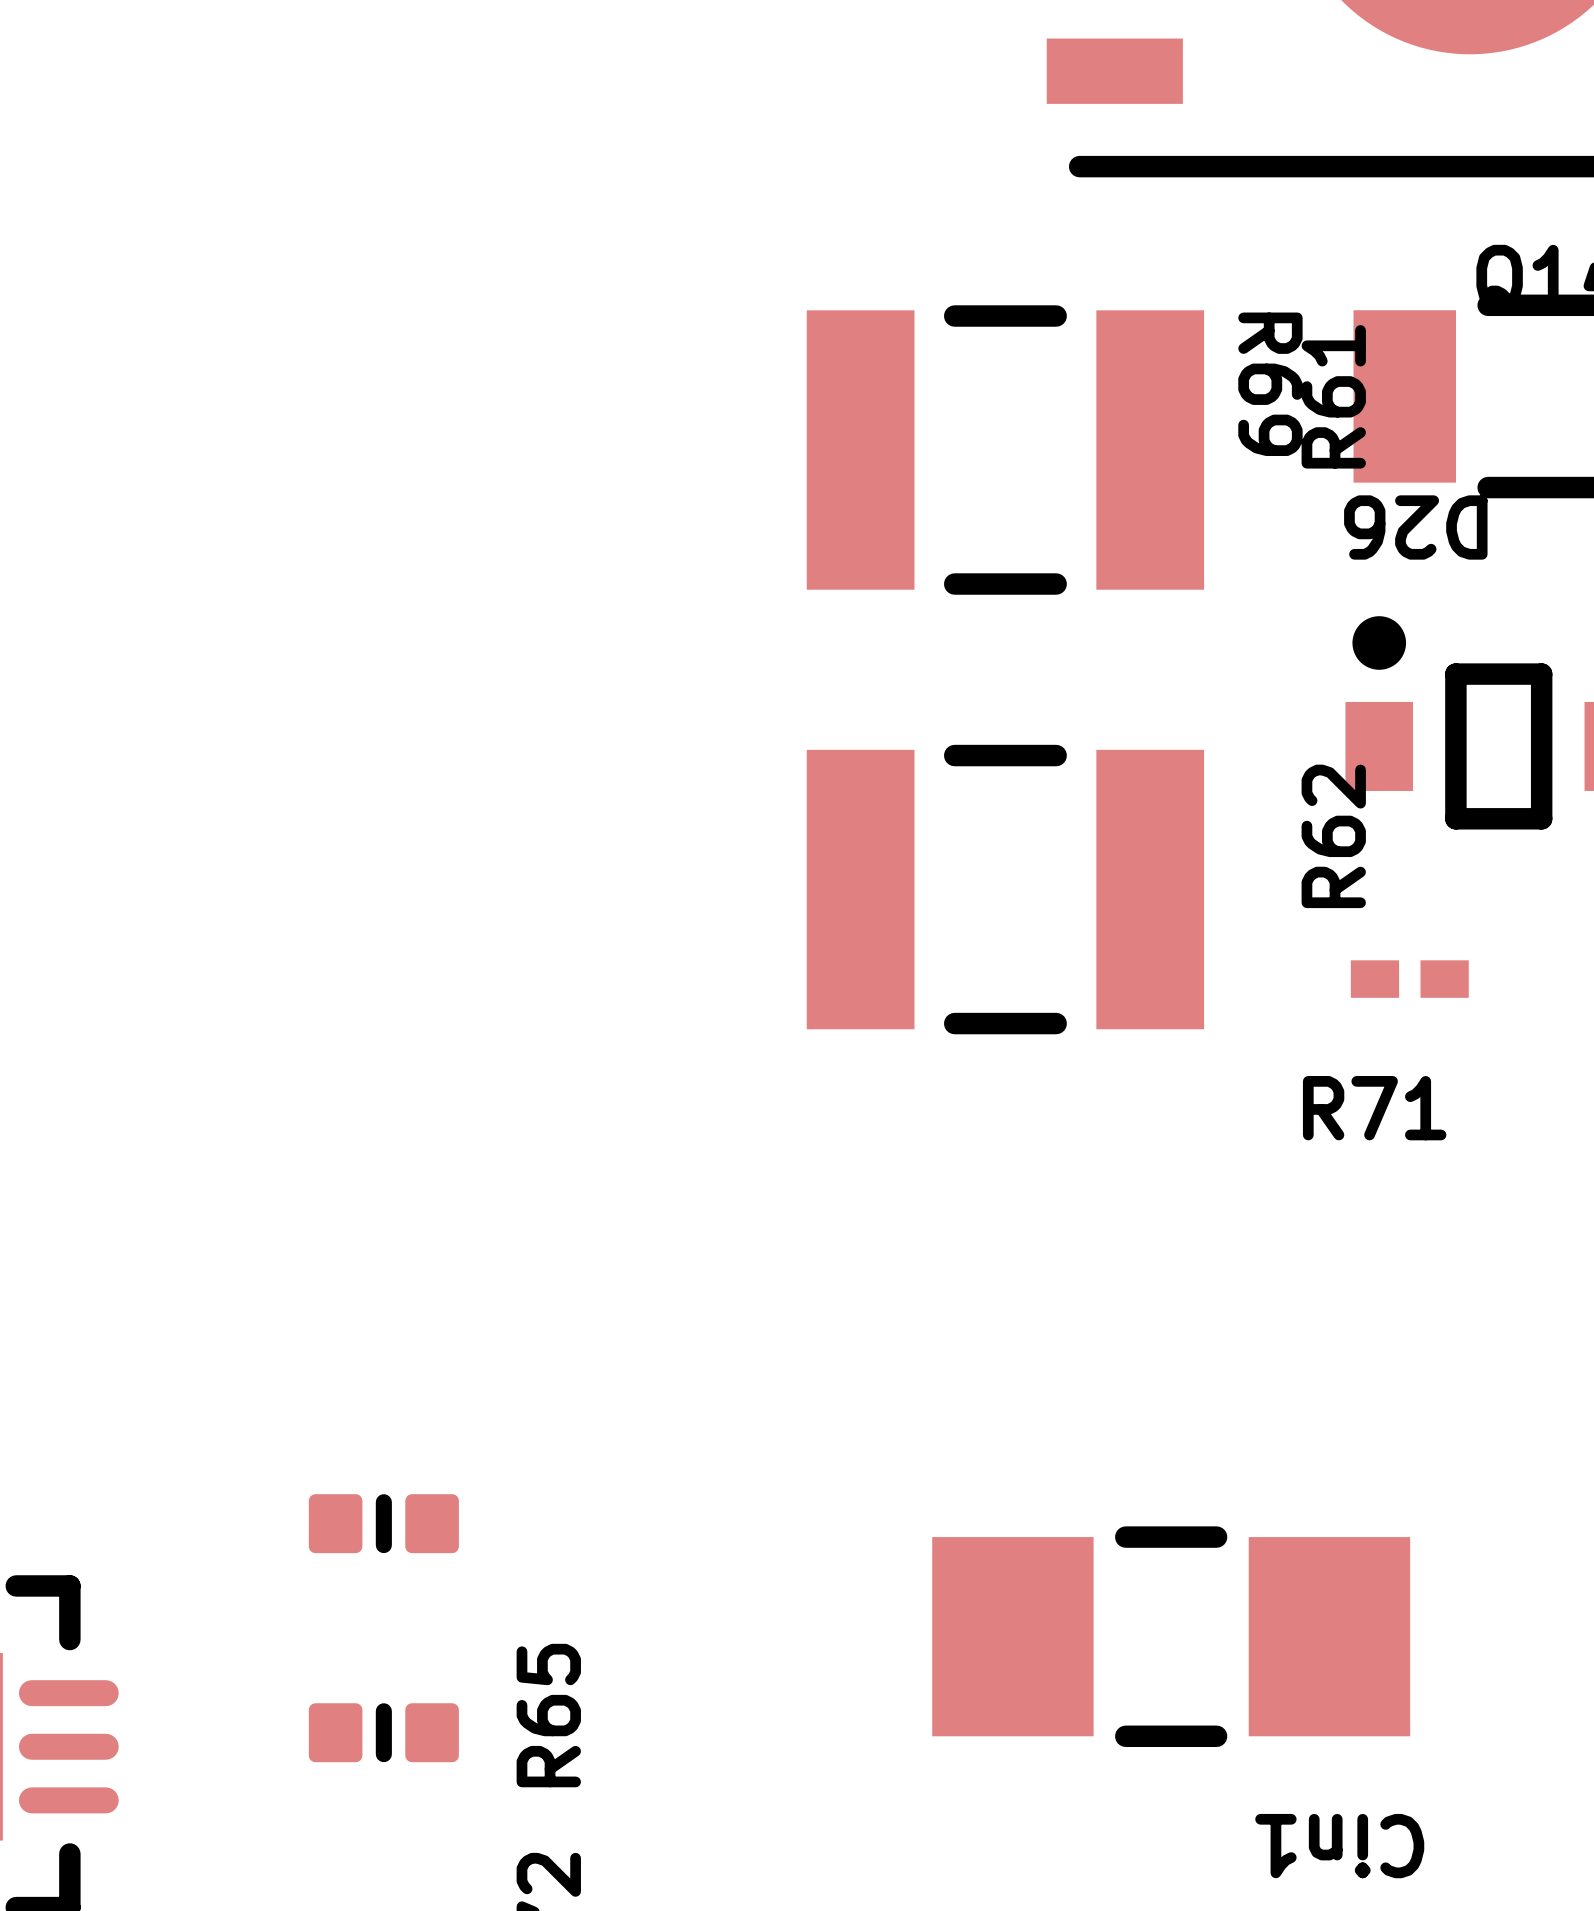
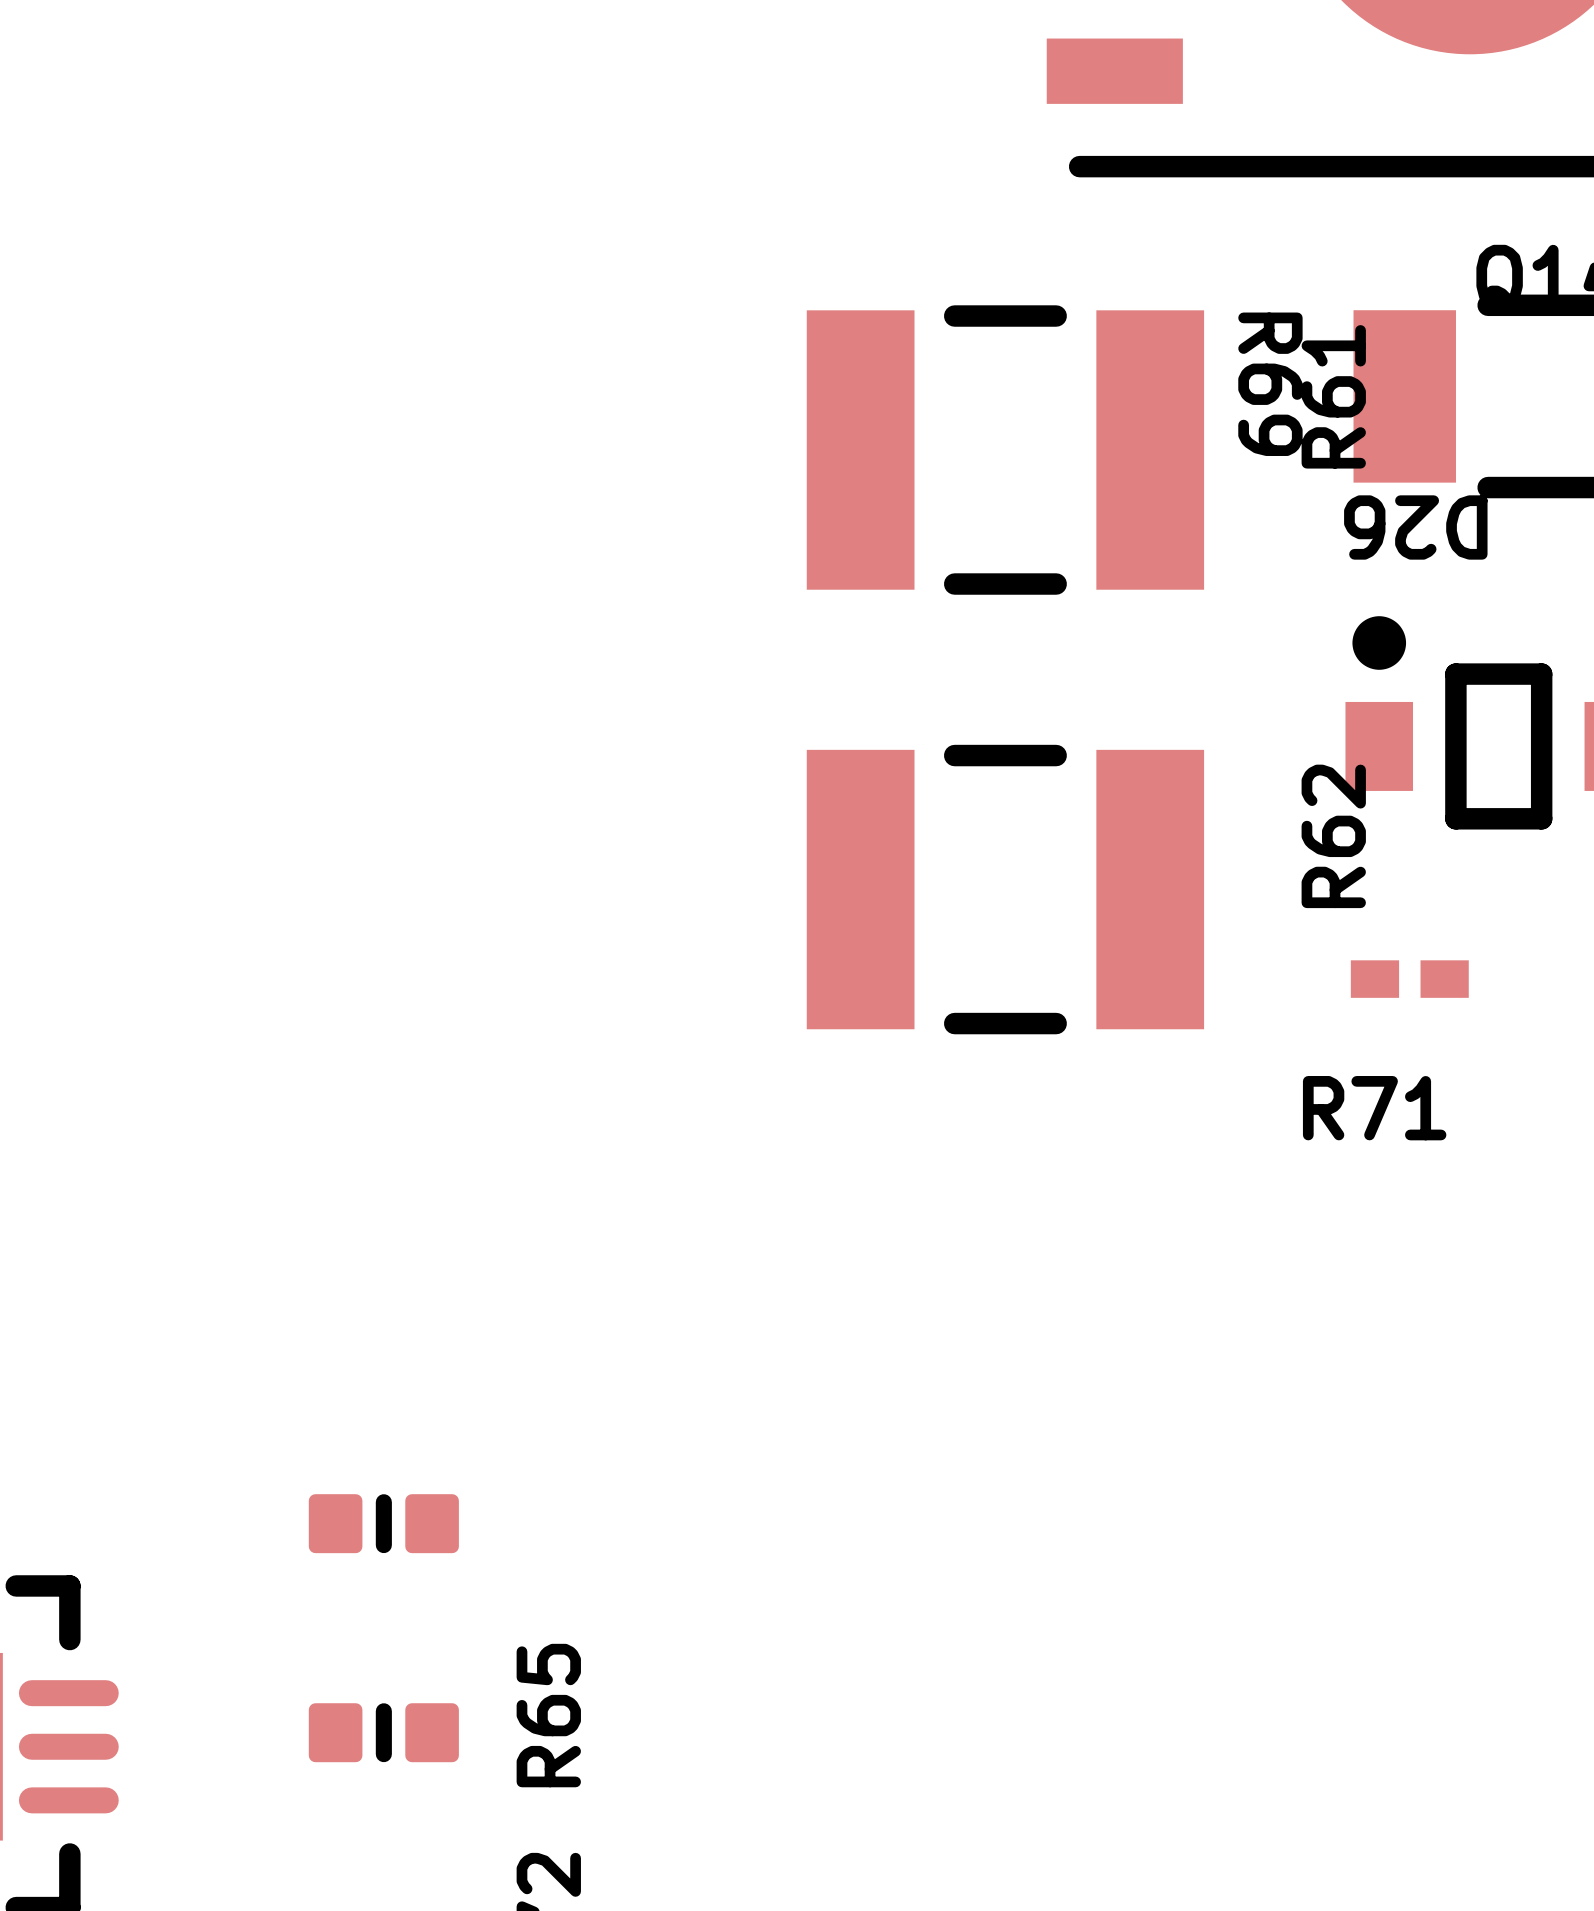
Cin1: (1171, 1636) -> none

